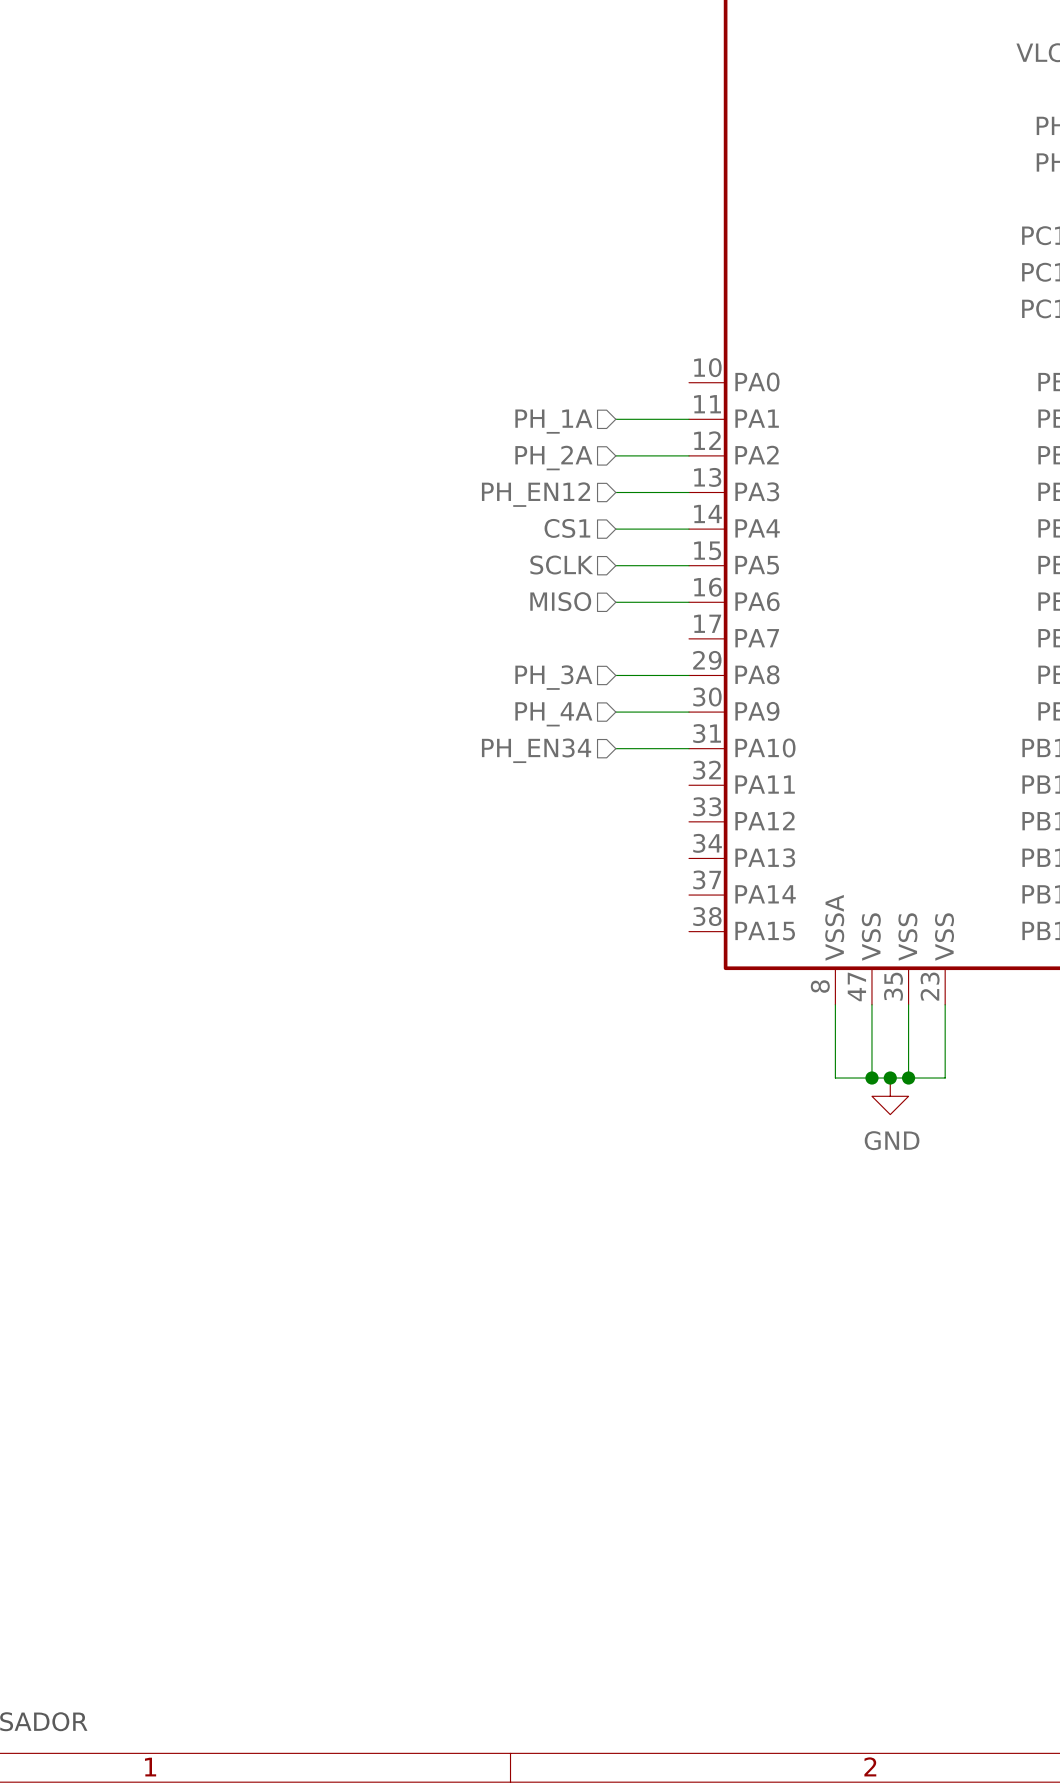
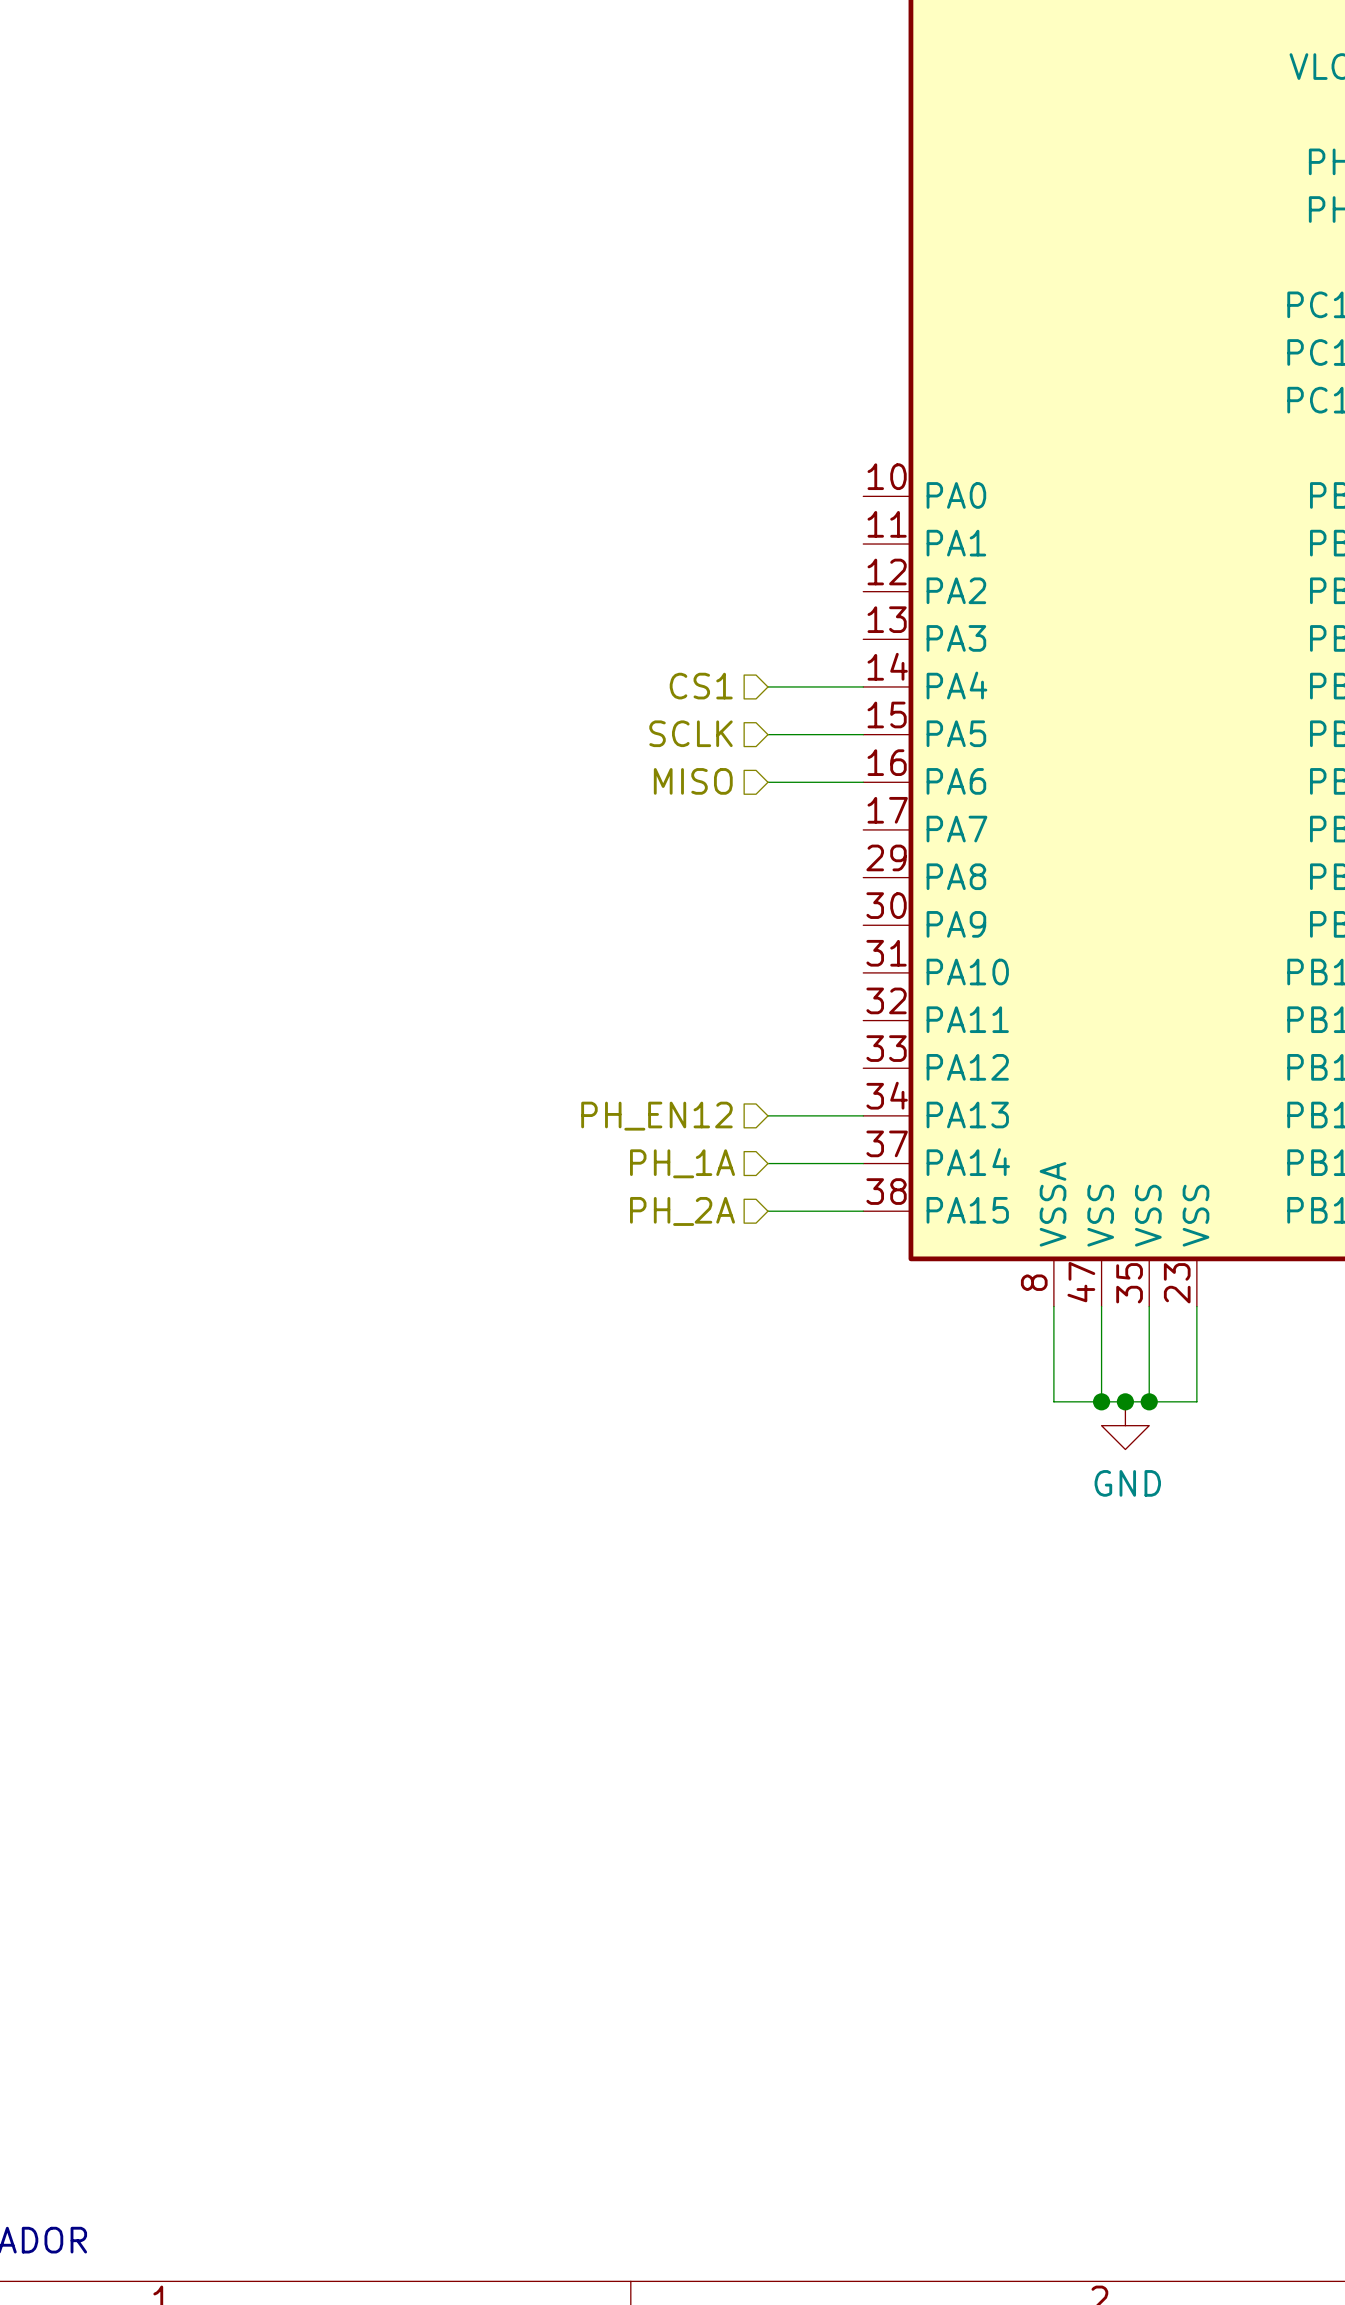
wire: (615, 419) (689, 419) -> none
hierarchical label: PH_1A (553, 421) -> none
wire: (615, 455) (689, 455) -> none
hierarchical label: PH_2A (553, 458) -> none
wire: (615, 492) (689, 492) -> none
hierarchical label: PH_EN12 (536, 494) -> none
wire: (615, 675) (689, 675) -> (767, 1115) (863, 1115)
hierarchical label: PH_3A (553, 677) -> none
wire: (615, 712) (689, 712) -> (767, 1163) (863, 1163)
hierarchical label: PH_4A (553, 714) -> none
wire: (615, 748) (689, 748) -> (767, 1211) (863, 1211)
hierarchical label: PH_EN34 (536, 750) -> none
hierarchical label: none -> PH_EN12 (656, 1116)
hierarchical label: none -> PH_1A (682, 1163)
hierarchical label: none -> PH_2A (682, 1211)

